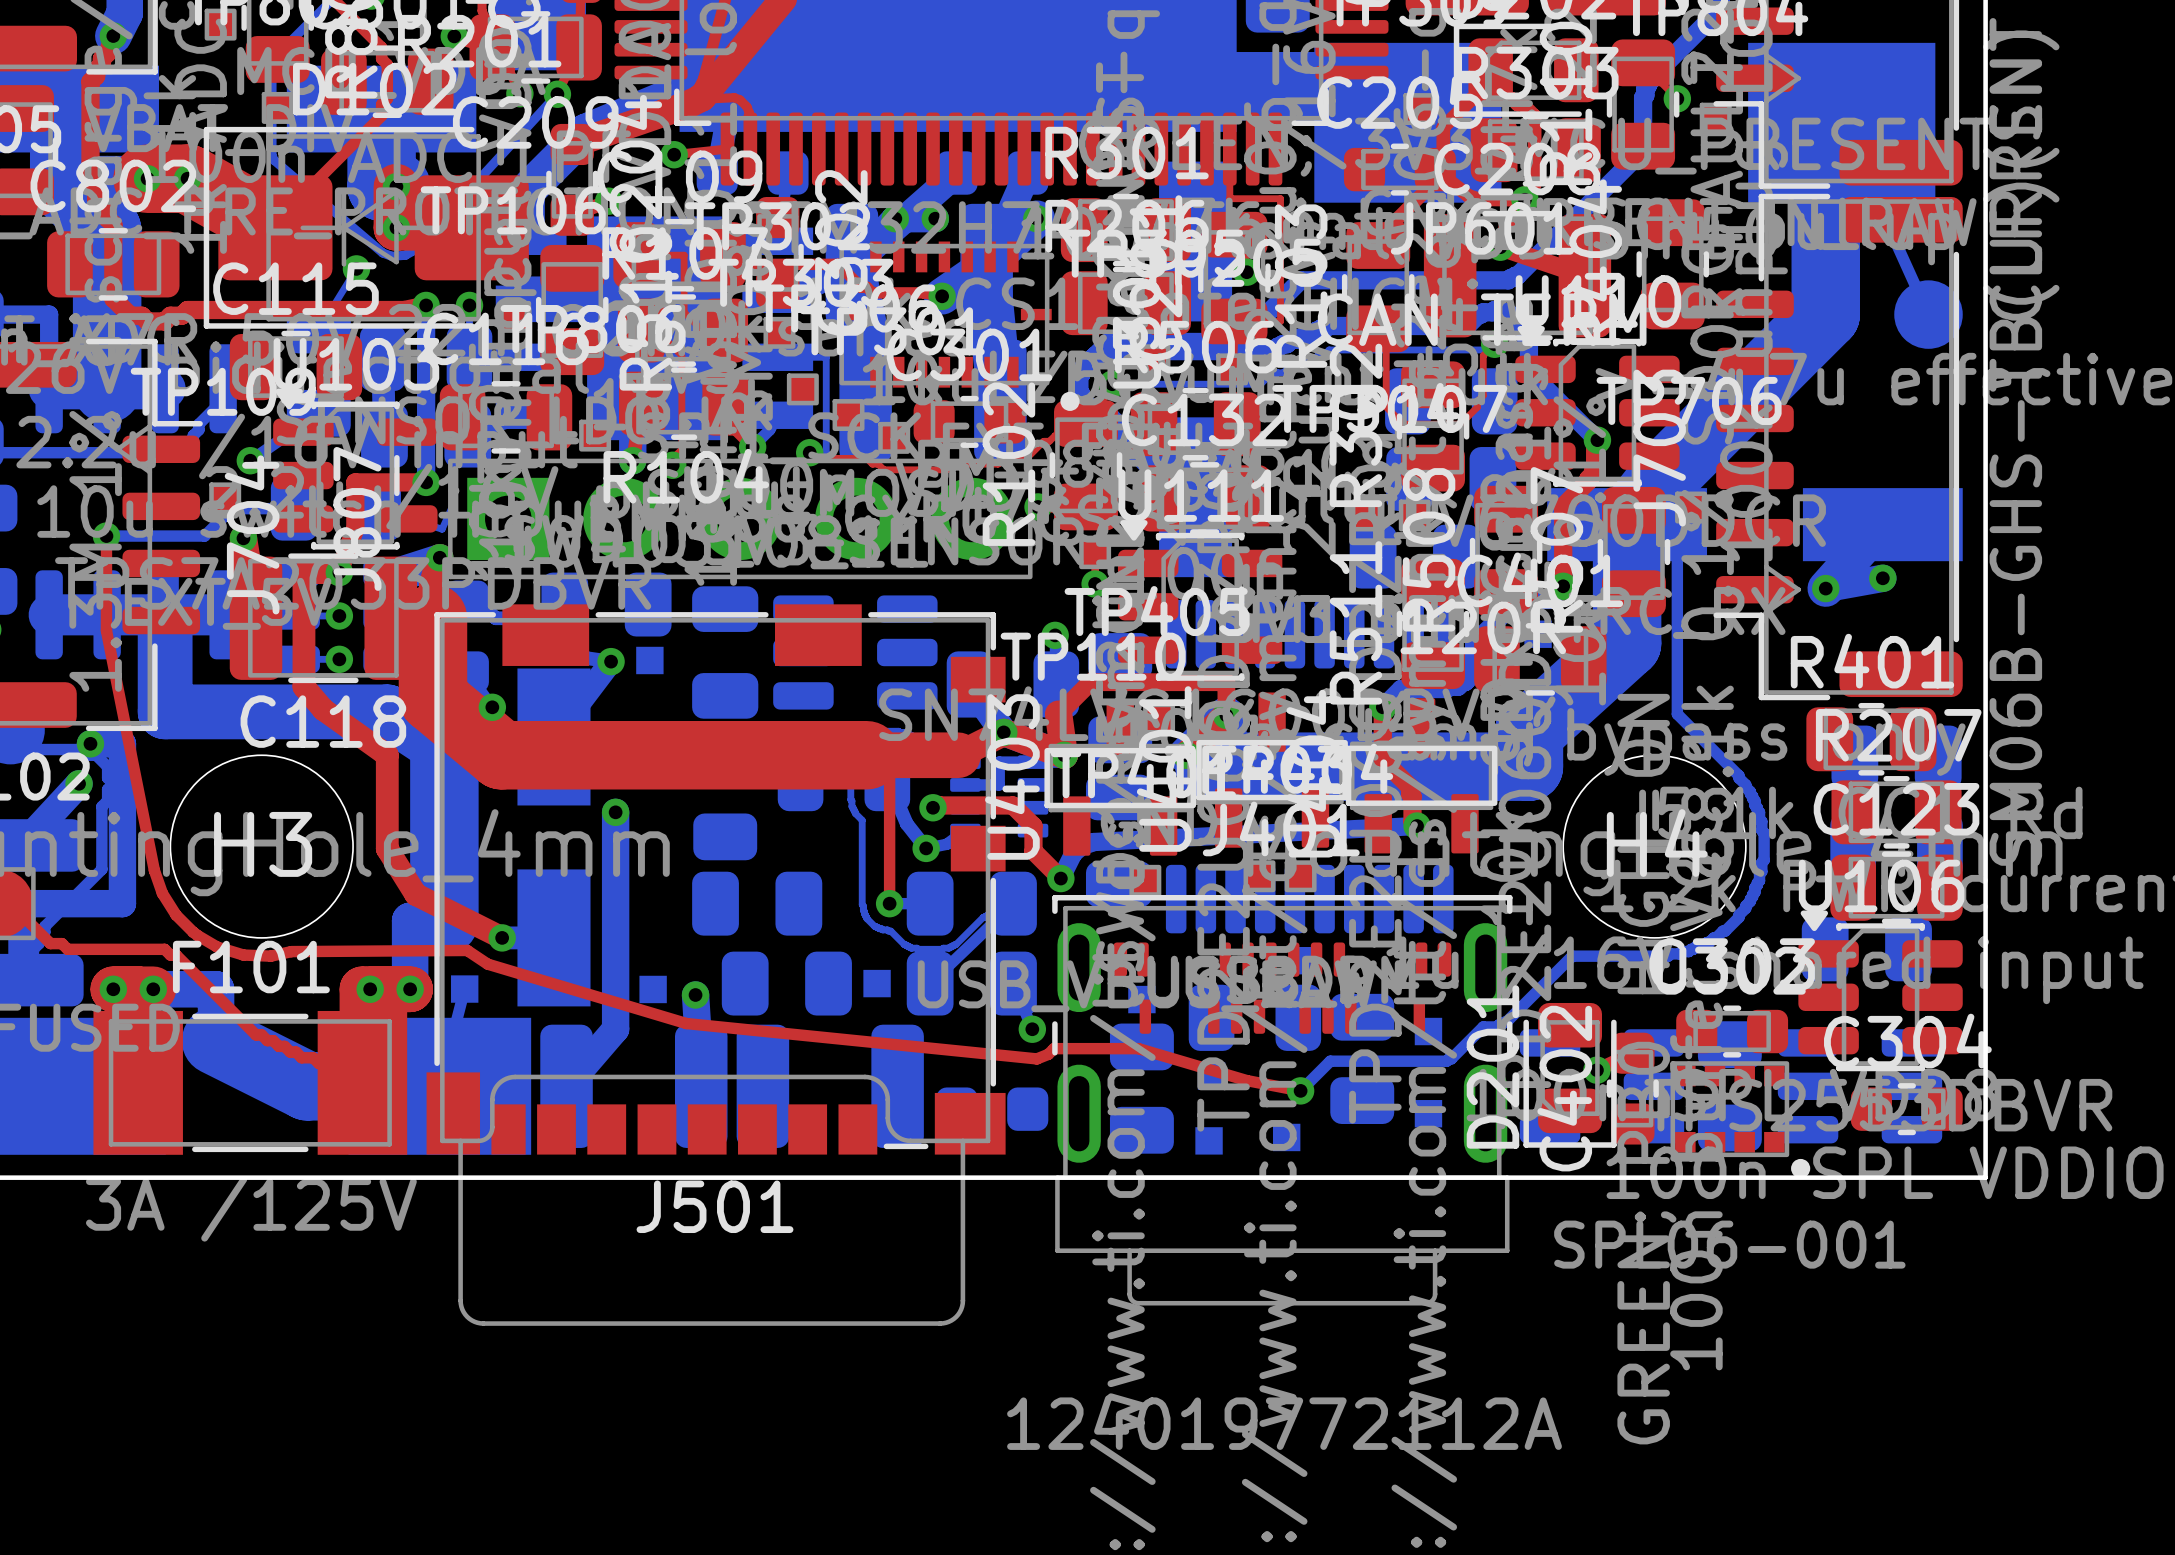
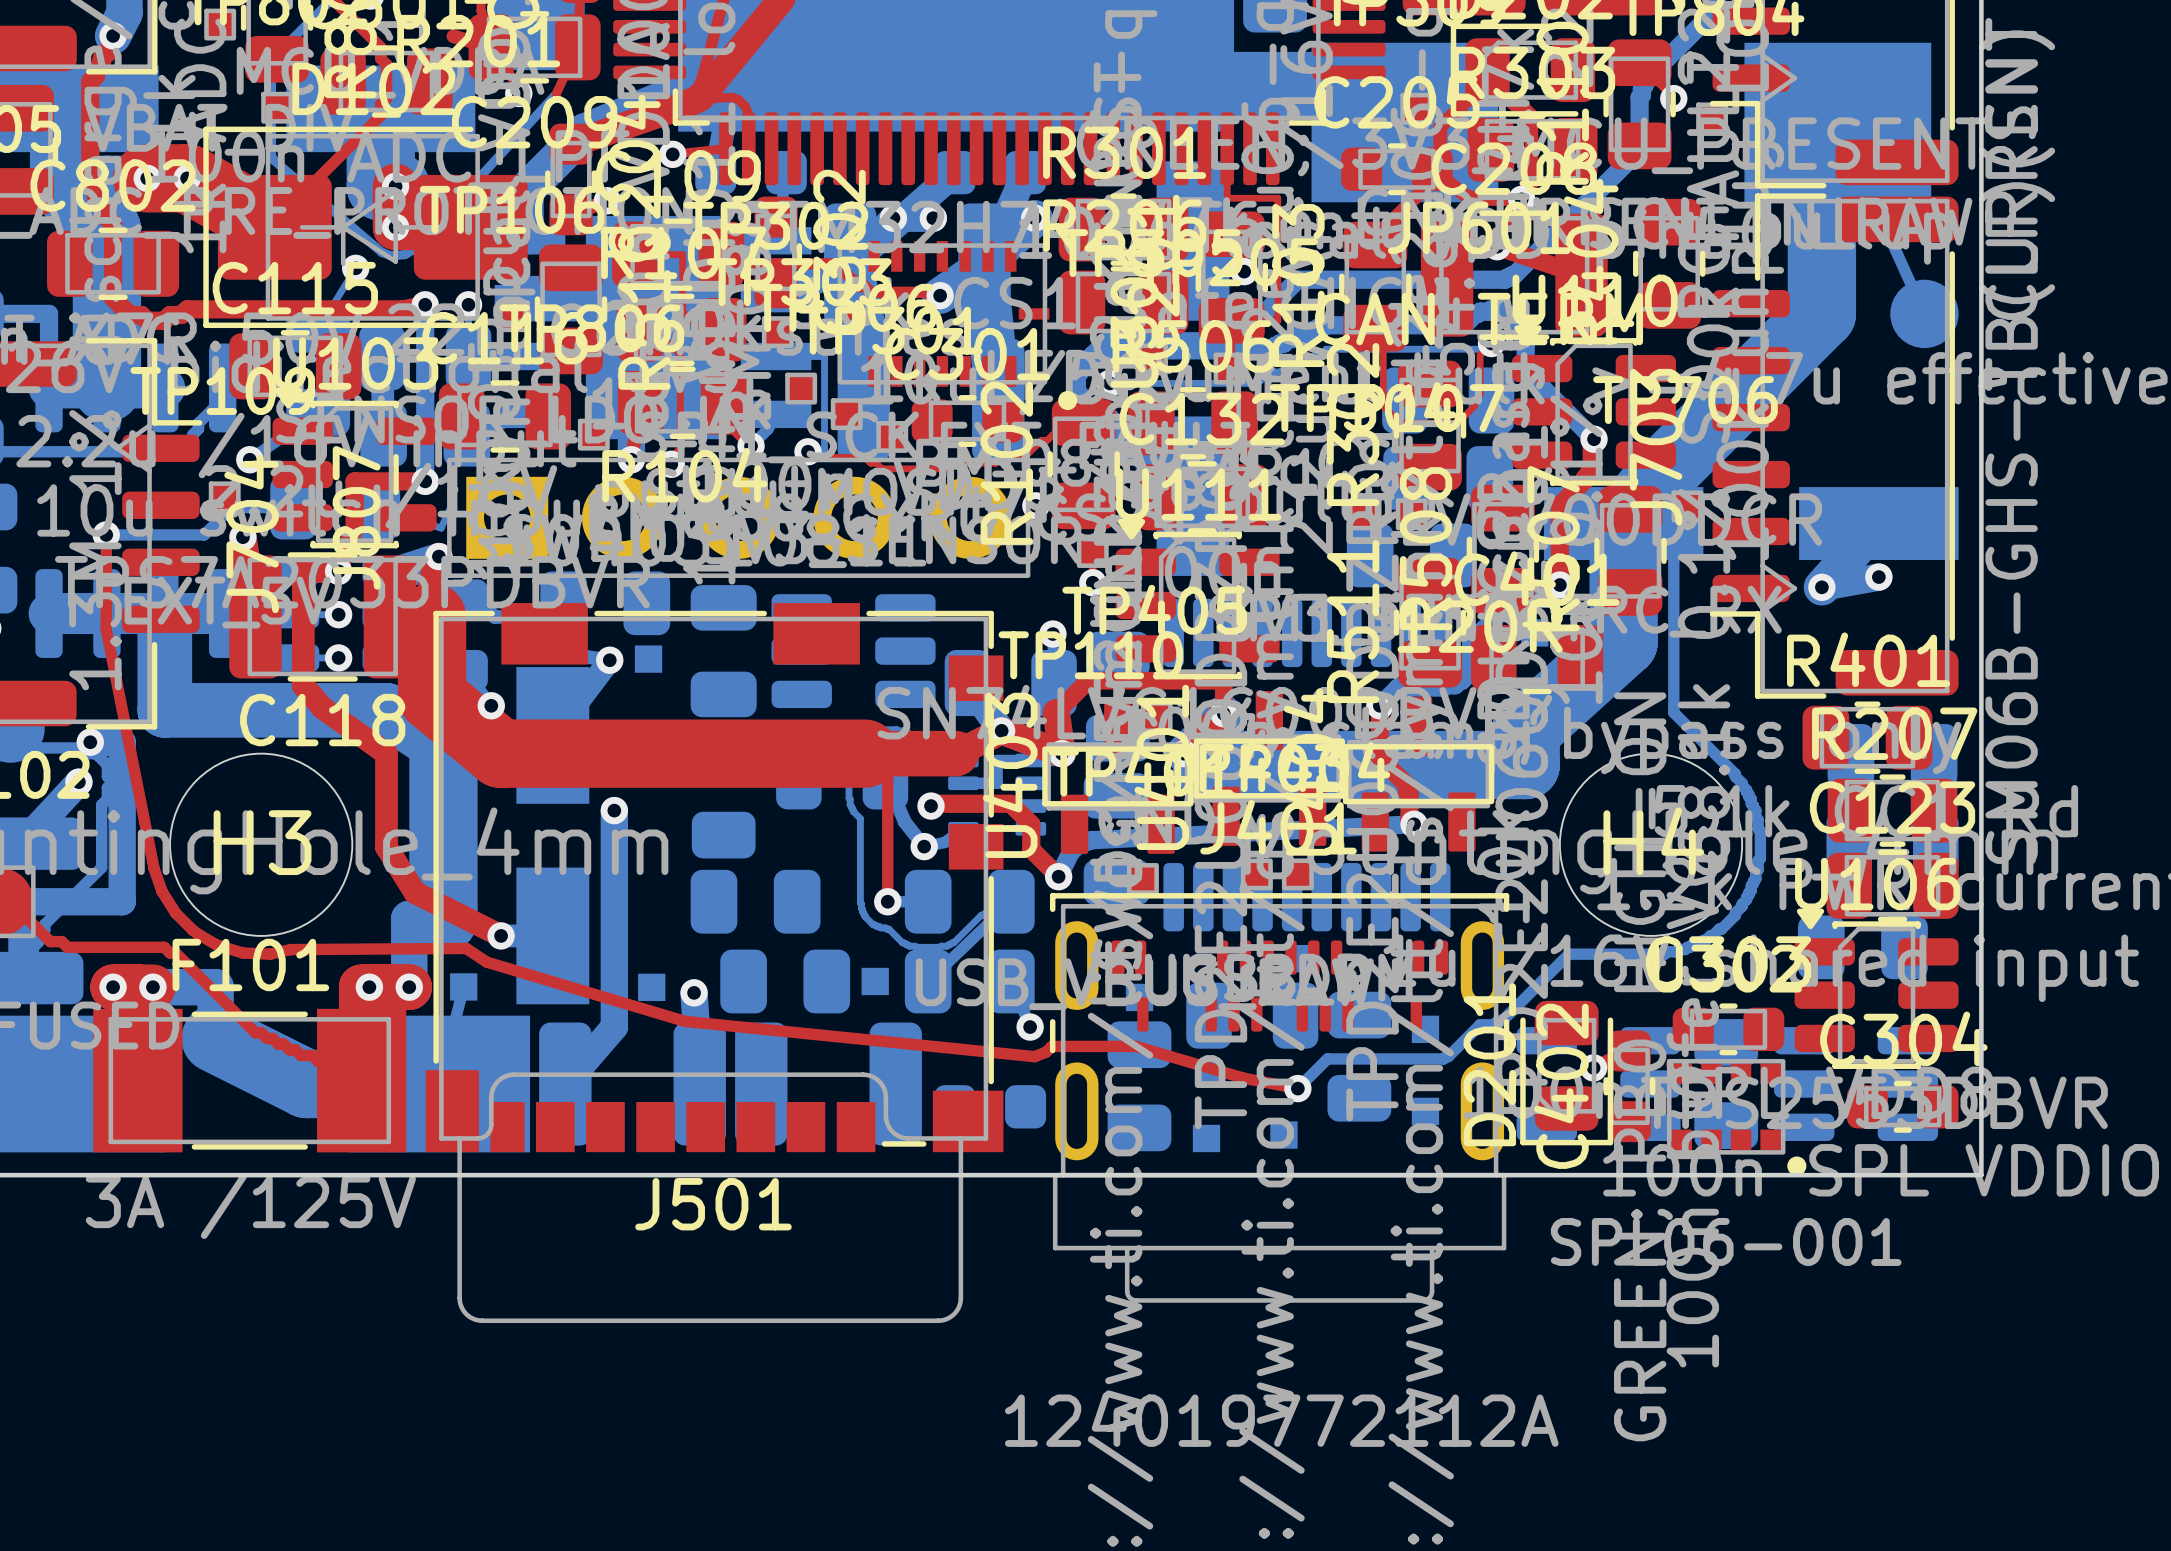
via: (454, 36) -> none
via: (557, 94) -> none

